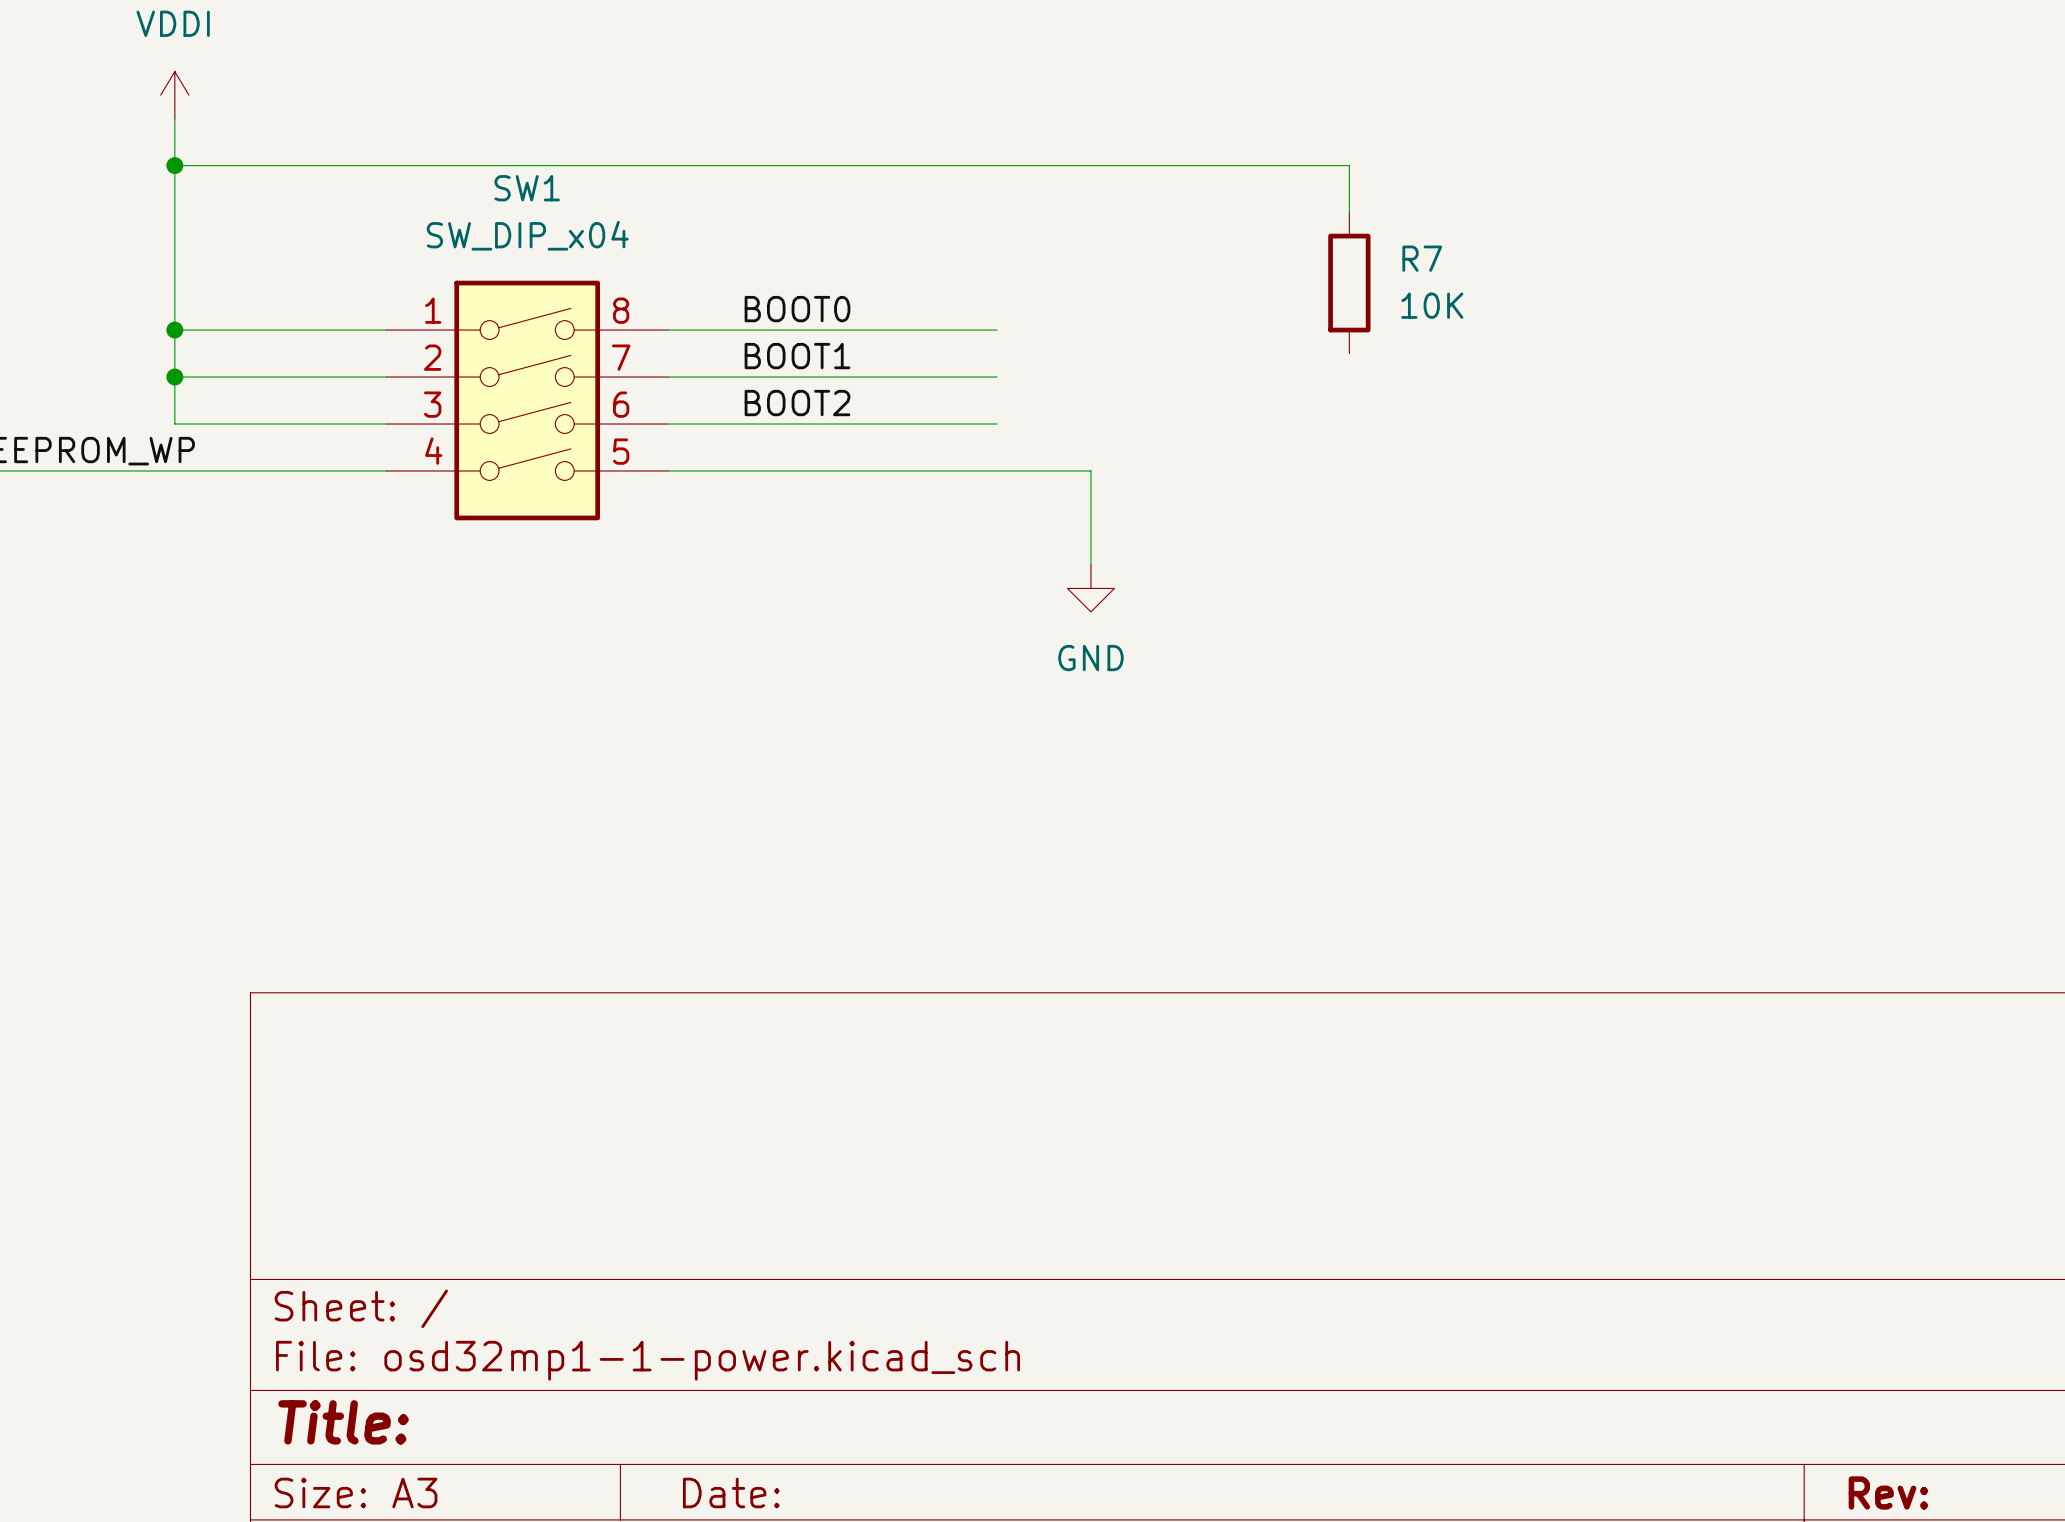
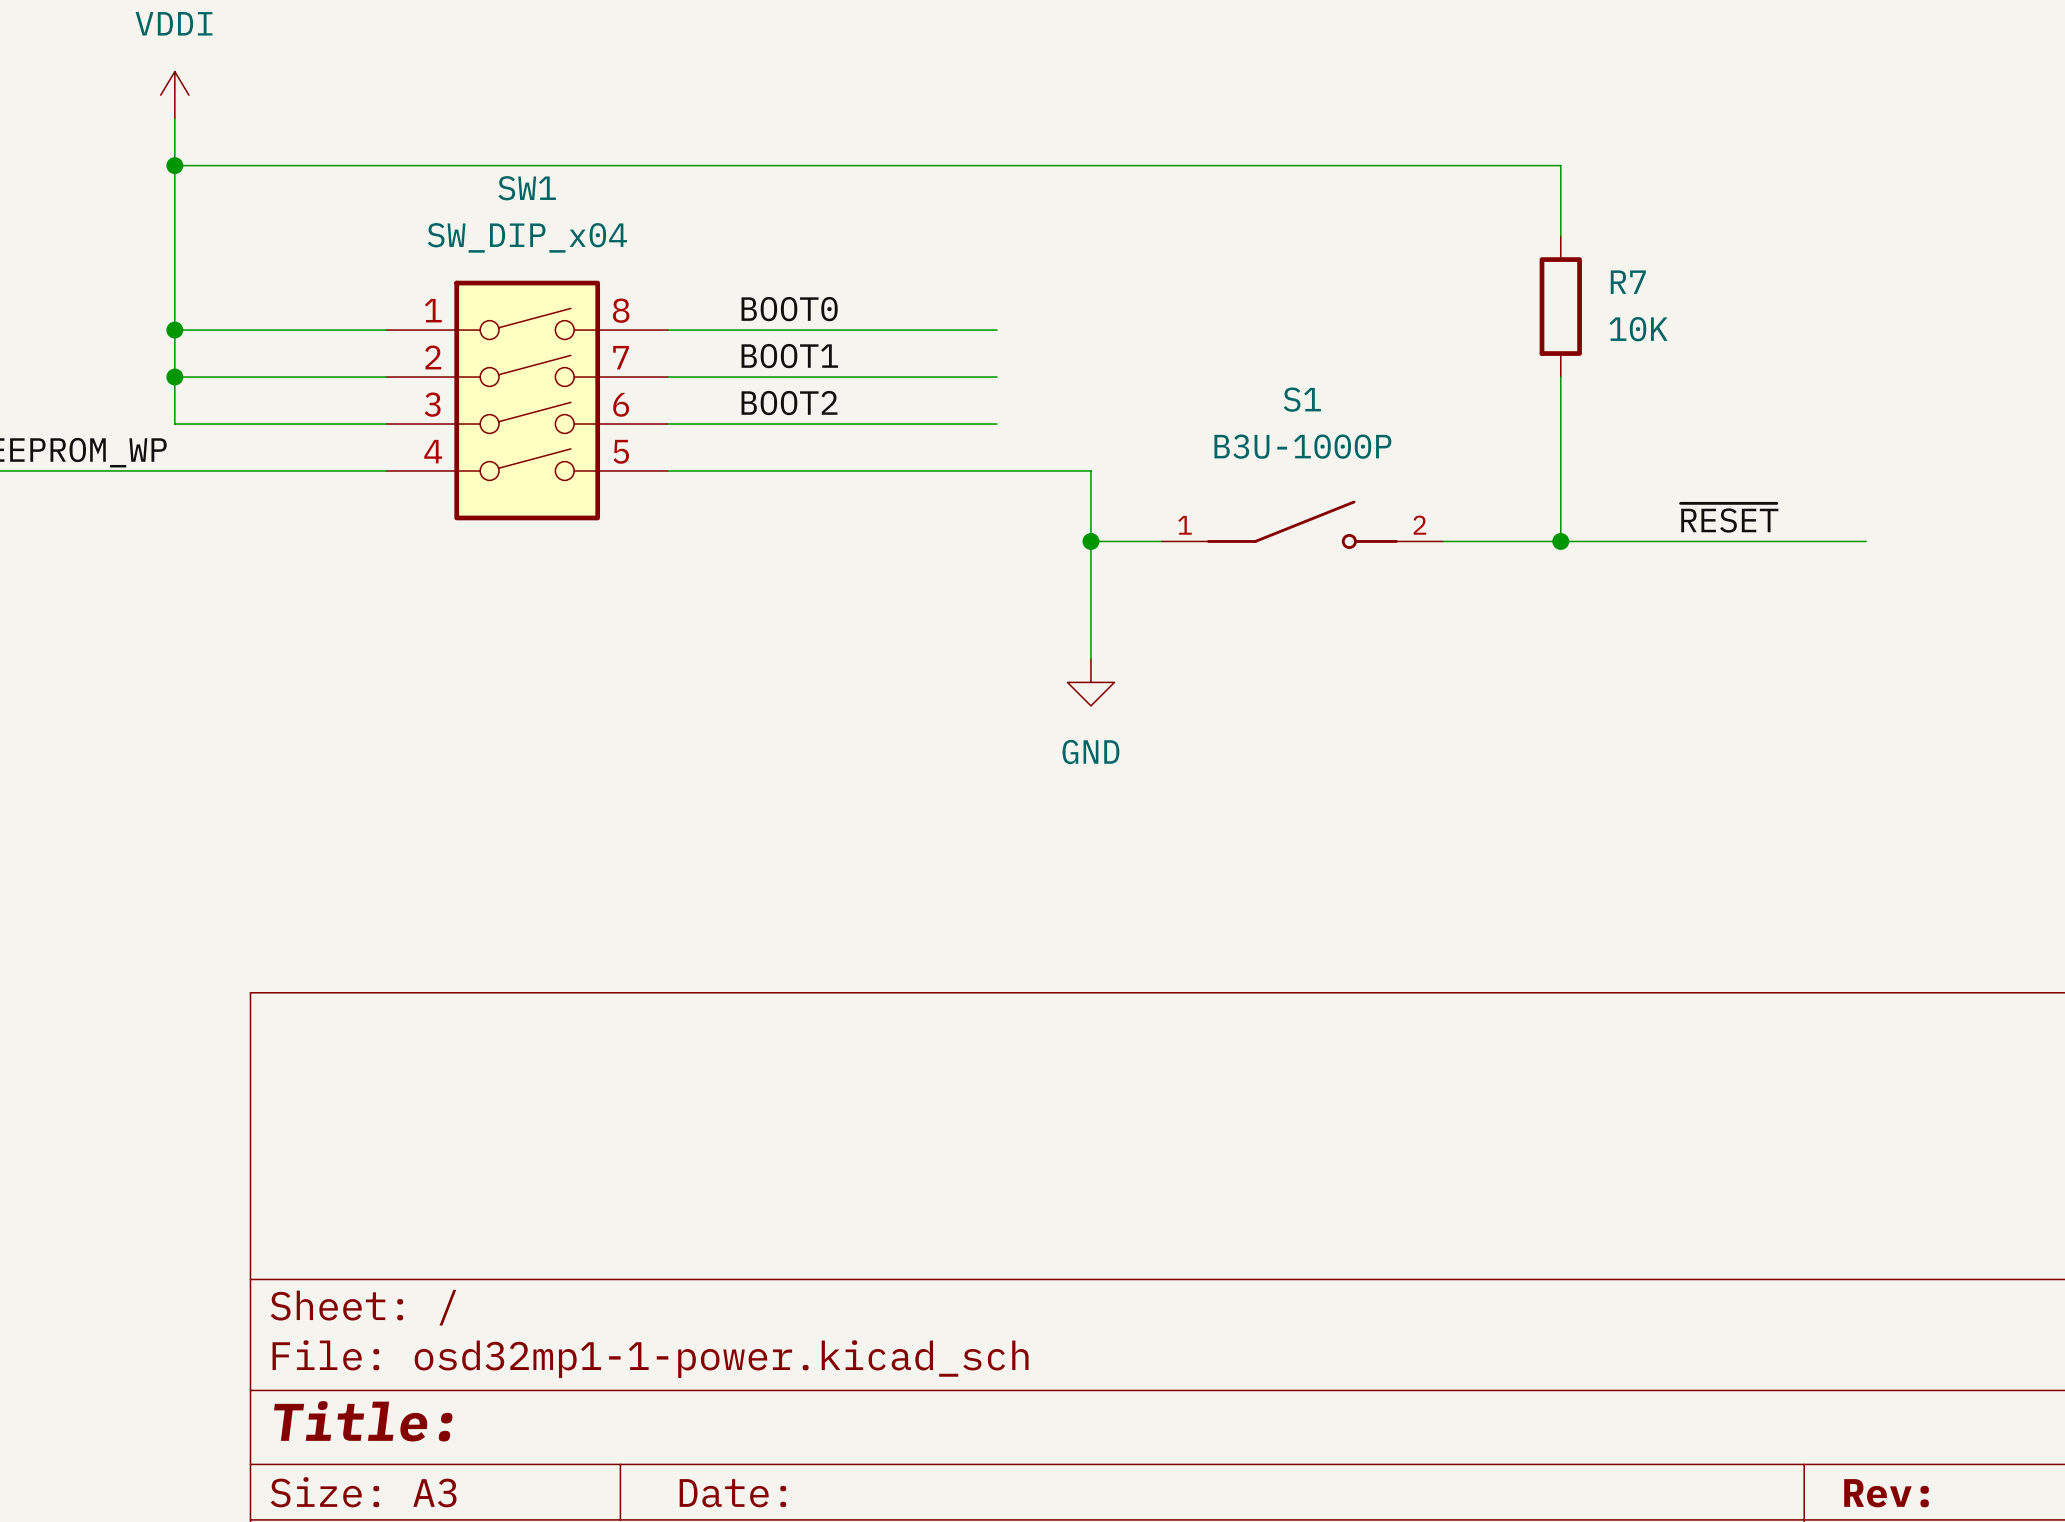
wire: (1349, 165) (1349, 212) -> (1349, 165) (1560, 165) (1560, 236)
R7 position: (1349, 283) -> (1560, 306)
wire: none -> (1560, 377) (1560, 541)
label: none -> ~{RESET} (1729, 518)
S1: none -> B3U-1000P (1302, 524)
wire: none -> (1090, 541) (1161, 541)
junction: none -> (1090, 541)
wire: none -> (1443, 541) (1866, 541)
junction: none -> (1560, 541)
wire: none -> (1090, 564) (1090, 658)
power symbol position: GND (1090, 588) -> GND (1090, 682)

